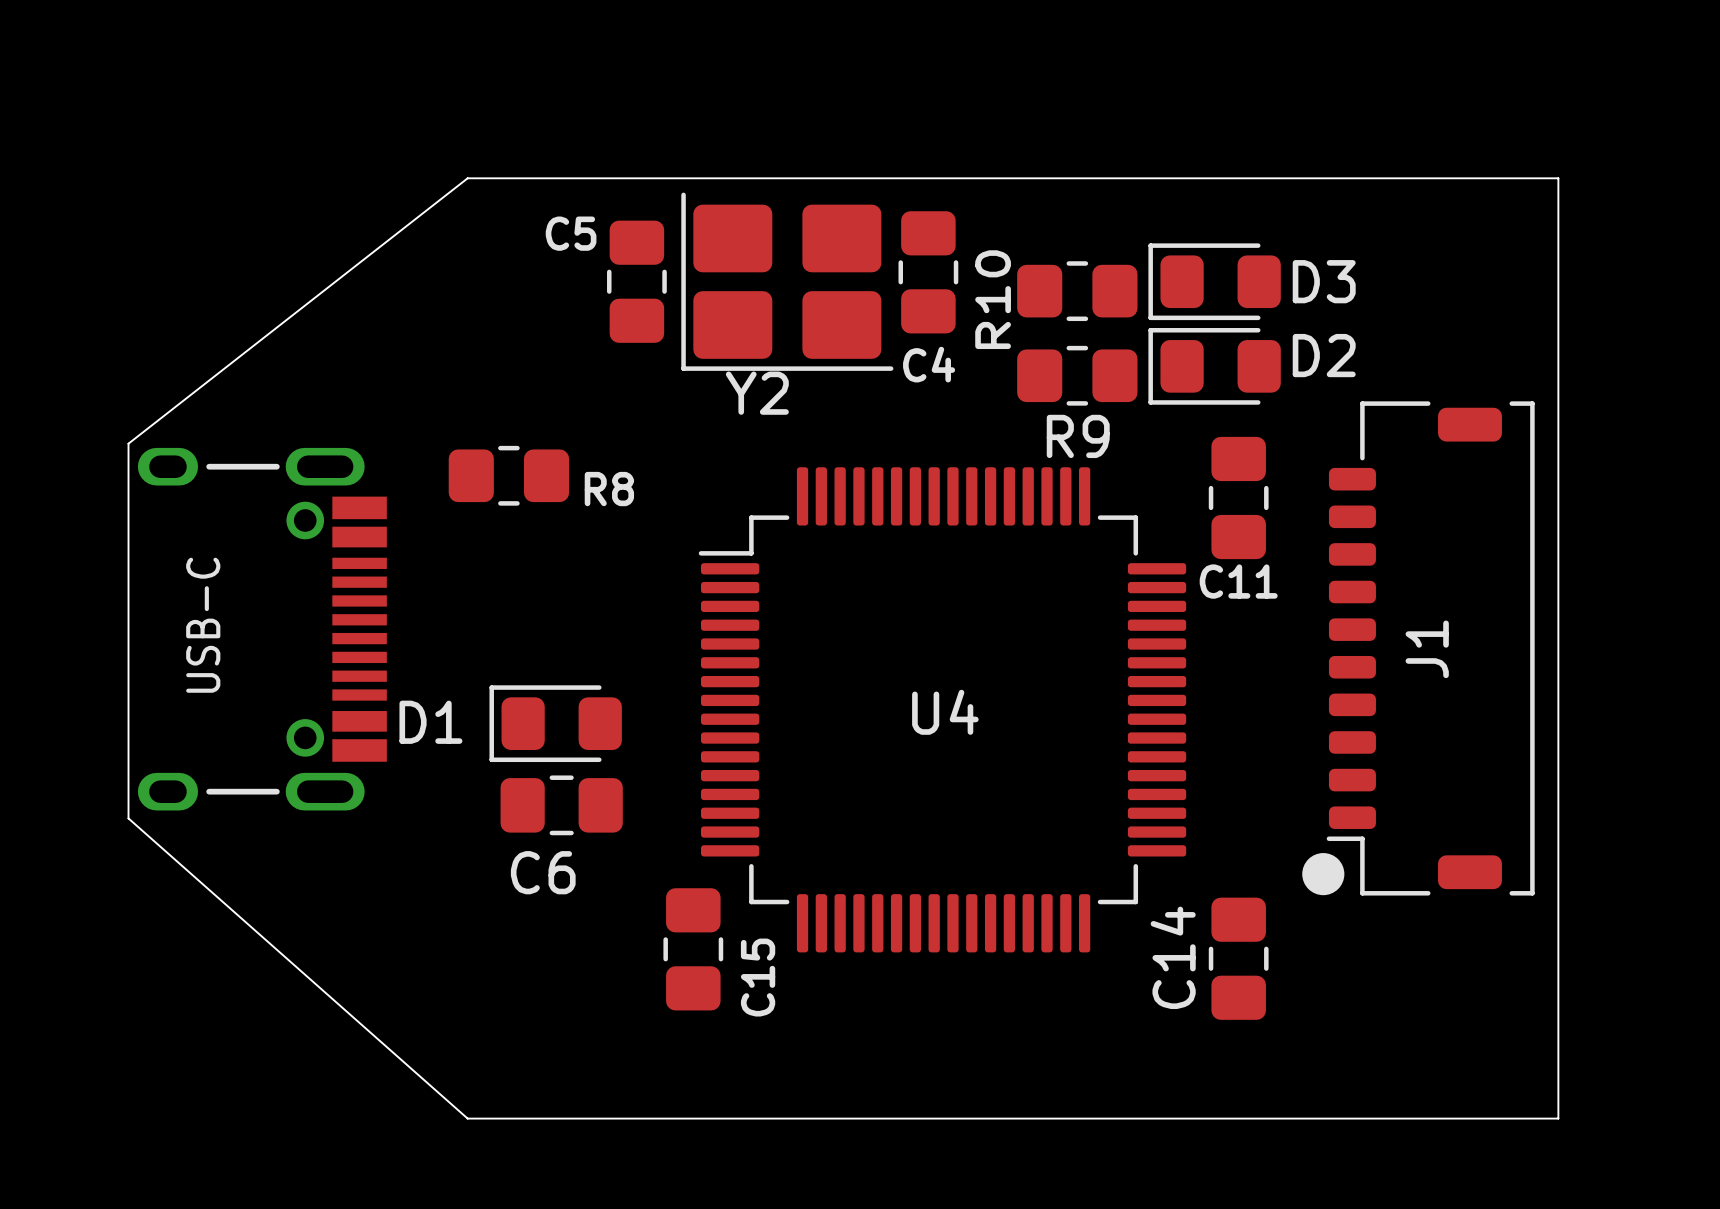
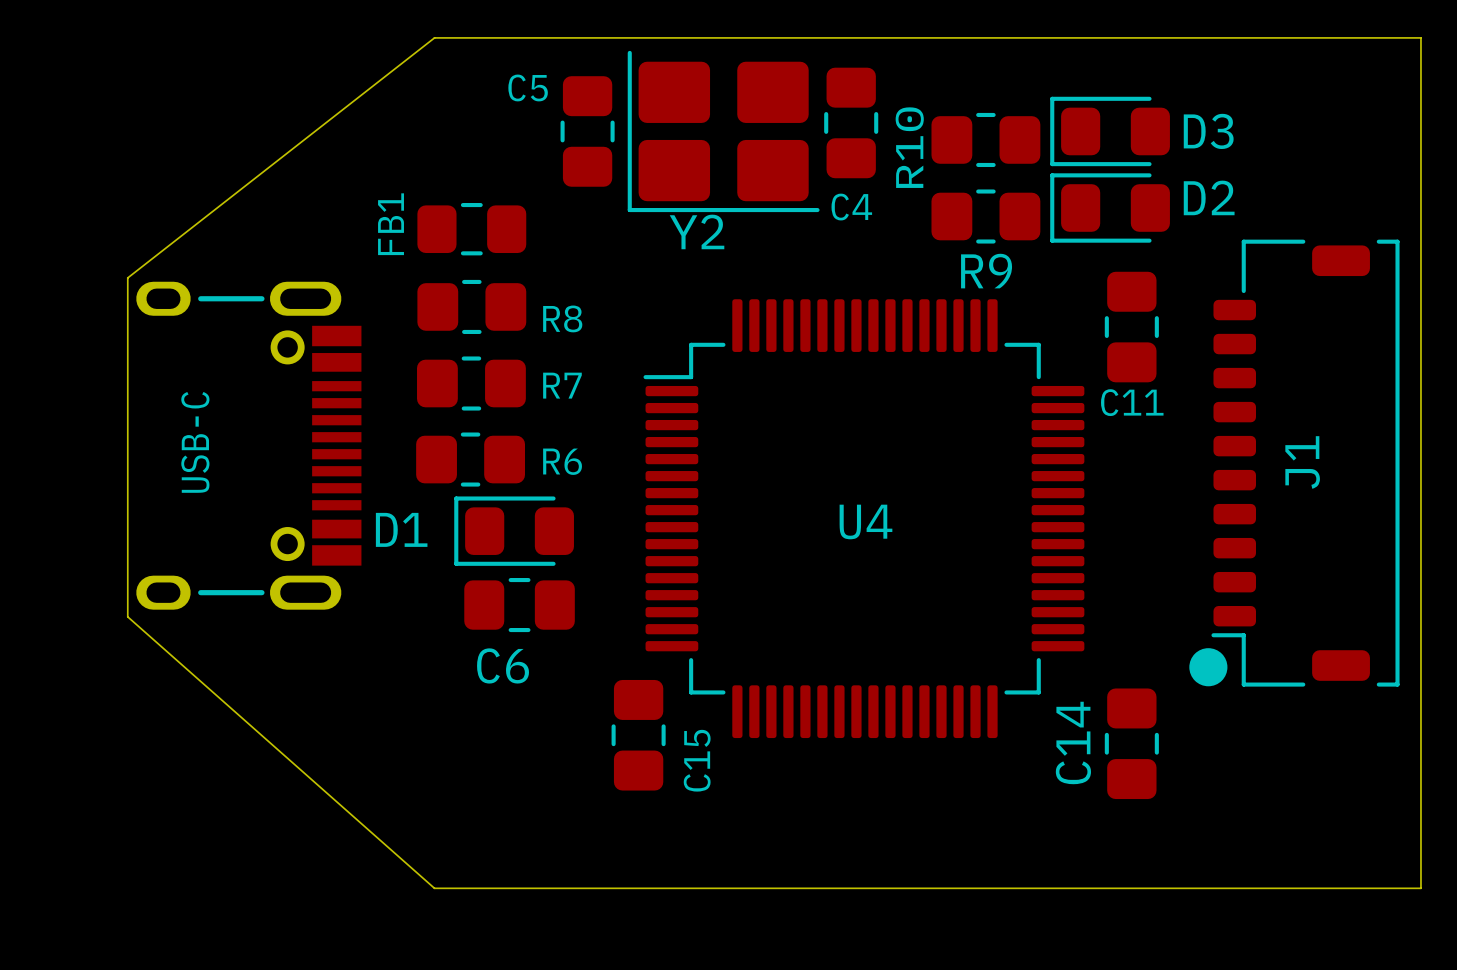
FB1: none -> (471, 229)
R7: none -> (471, 383)
R6: none -> (470, 459)

